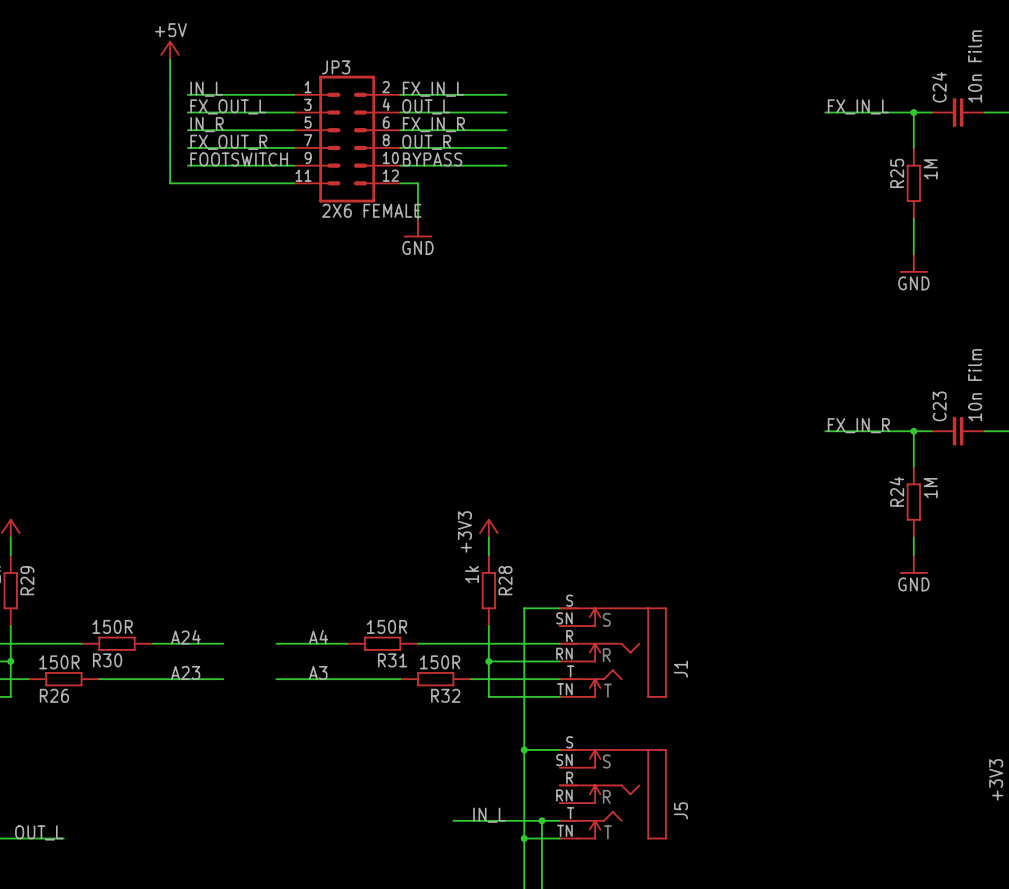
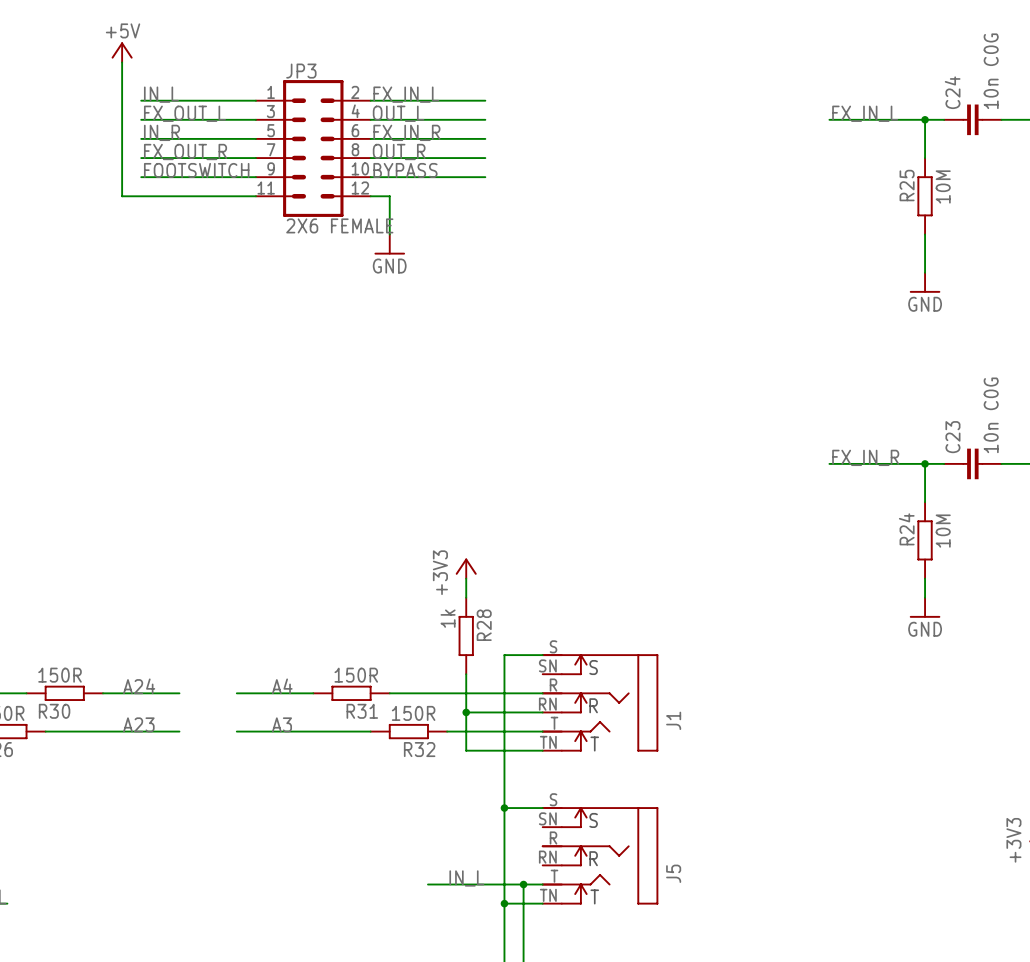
C24 value: 10n Film (975, 66) -> 10n C0G (991, 71)
R25 value: 1M (930, 169) -> 10M (943, 186)
C23 value: 10n Film (975, 385) -> 10n C0G (991, 415)
R24 value: 1M (930, 488) -> 10M (943, 531)

